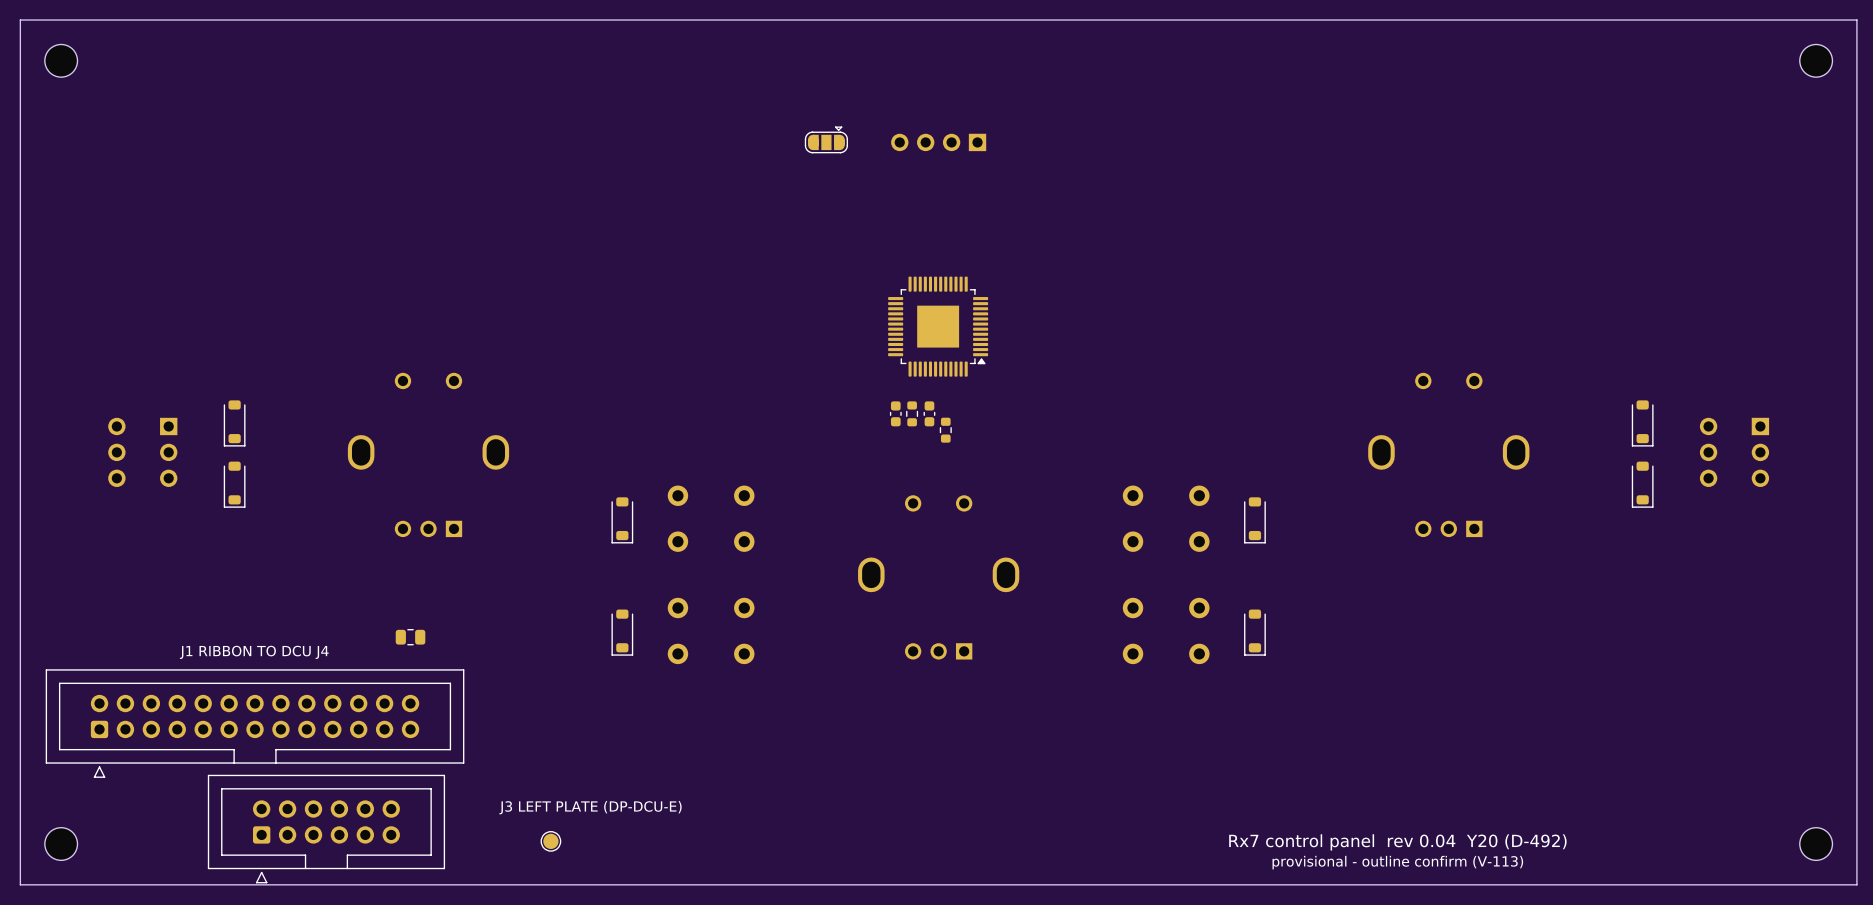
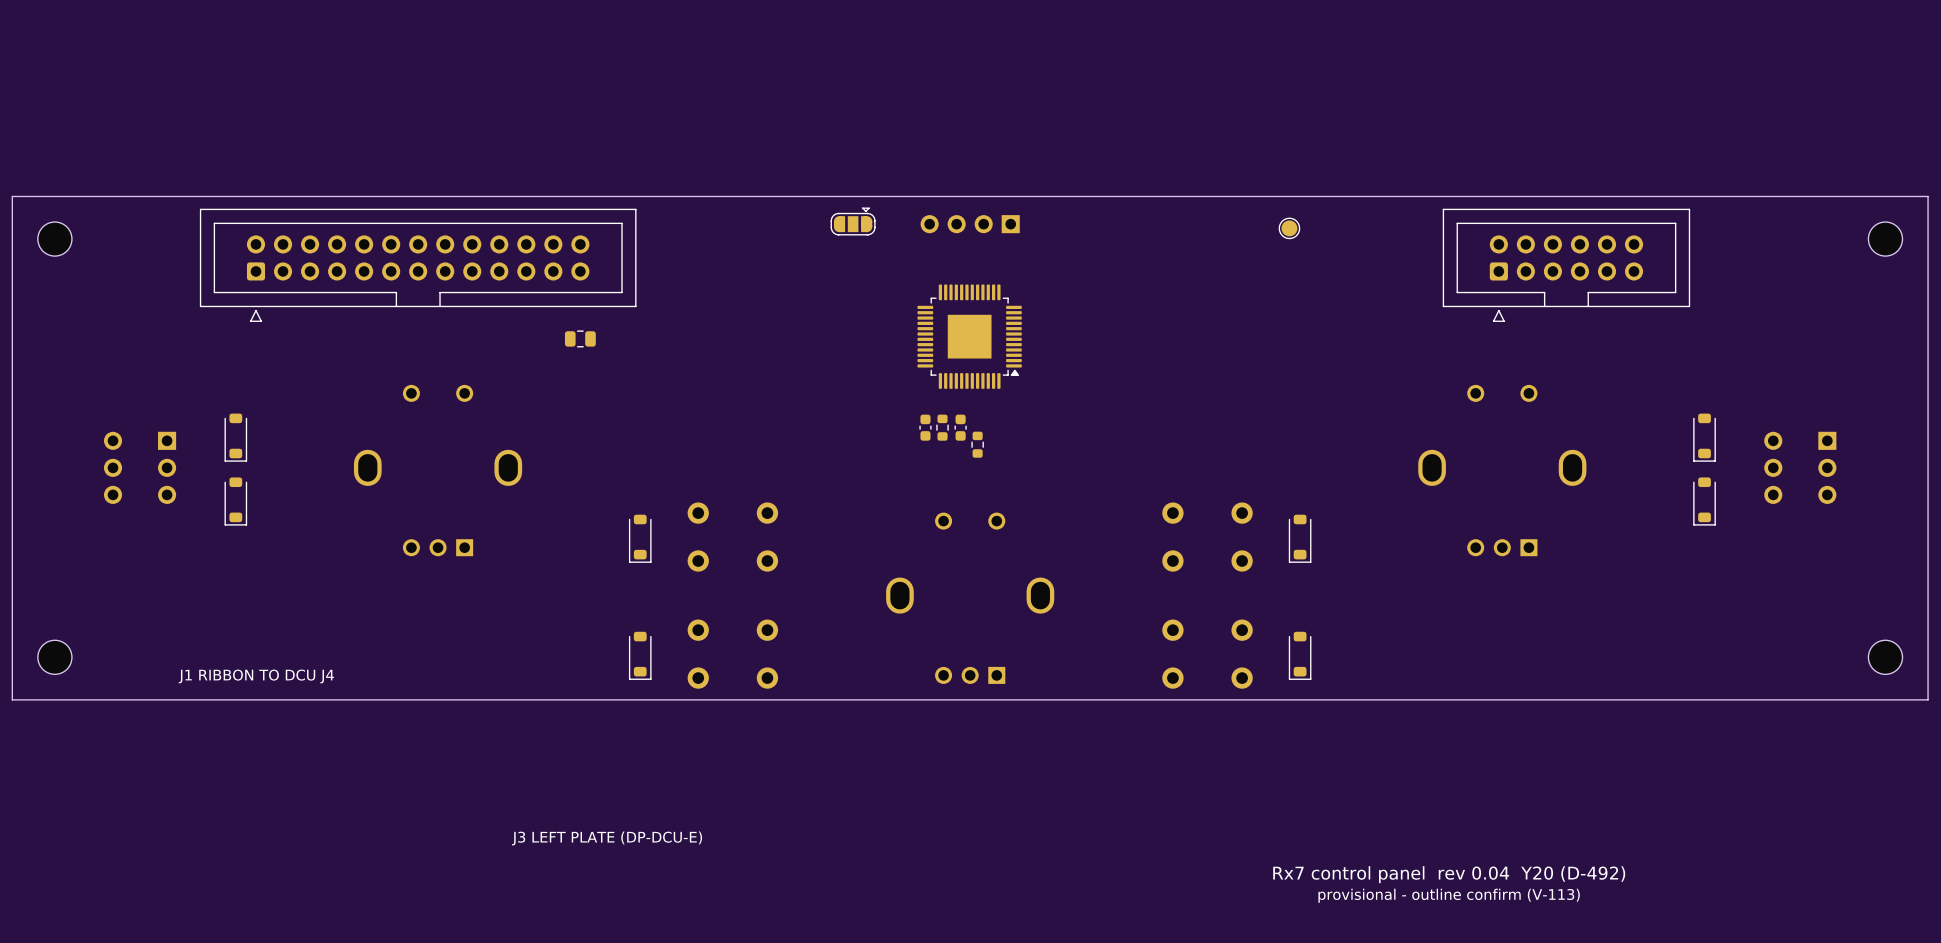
part position: (61, 60) -> (54, 239)
part position: (1816, 60) -> (1885, 239)
part position: (826, 139) -> (853, 221)
part position: (938, 142) -> (970, 224)
board edge: (1856, 192) (1856, 20) (20, 20) (20, 192) -> (1928, 196) (12, 196)
part: none -> (1289, 228)
part: none -> (418, 265)
part: none -> (1566, 265)
part: none -> (580, 338)
part: (410, 637) -> none
board edge: (1856, 674) (1856, 884) (20, 884) (20, 674) -> (1928, 699) (12, 699)
part: (255, 723) -> none
part: (326, 829) -> none
part: (550, 841) -> none
part position: (61, 844) -> (54, 657)
part position: (1816, 844) -> (1885, 657)

